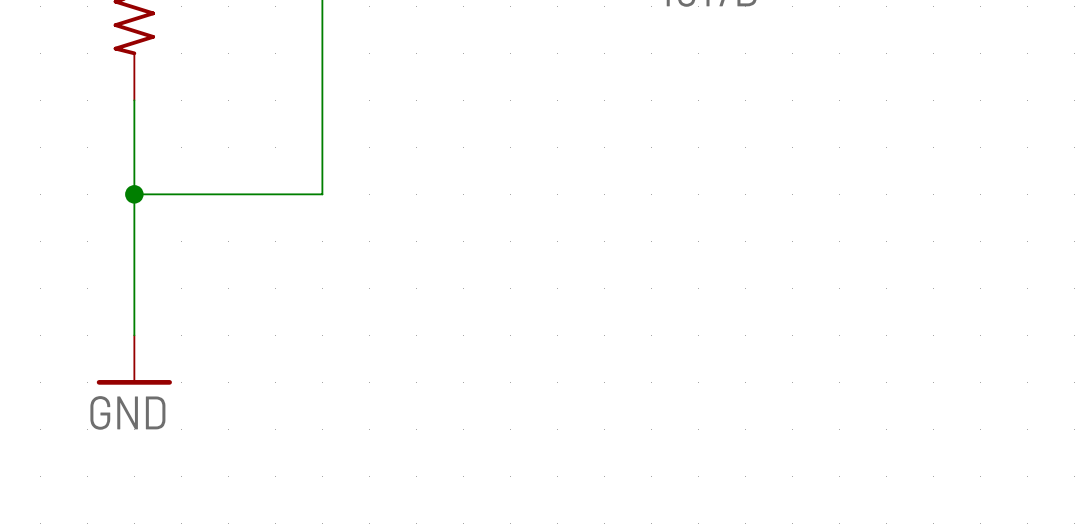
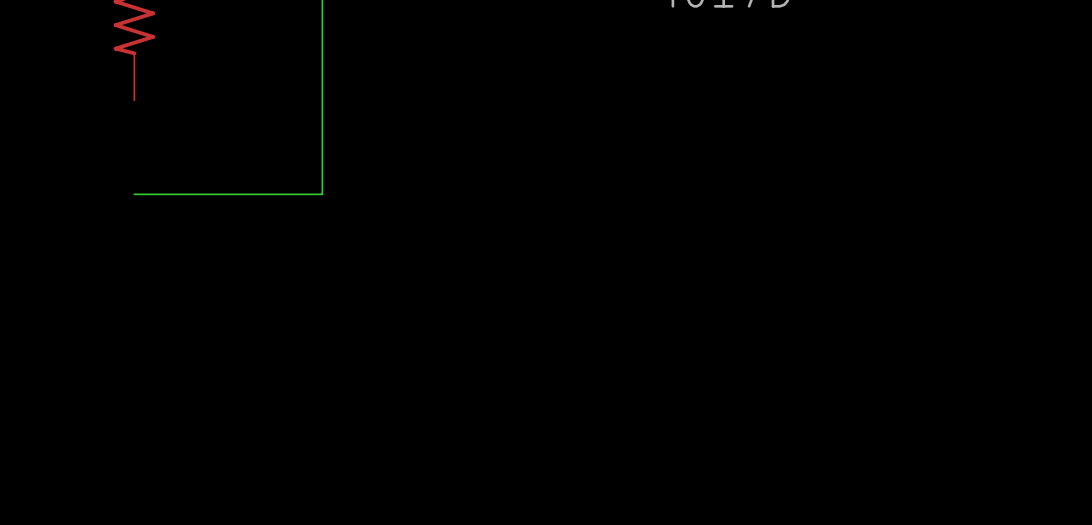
wire: (134, 100) (134, 335) -> none
junction: (134, 194) -> none
power symbol: GND (134, 360) -> none

